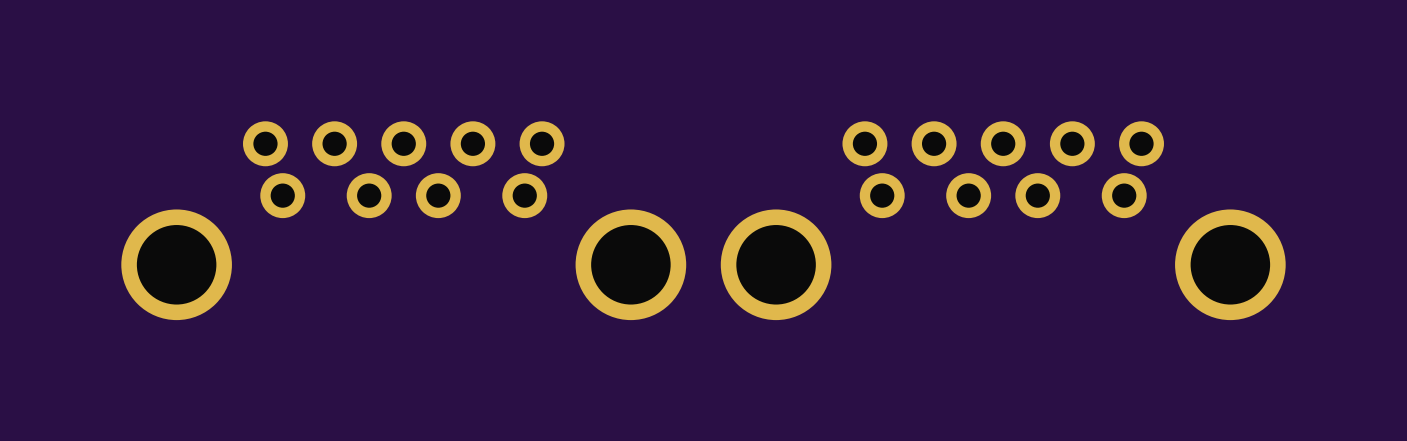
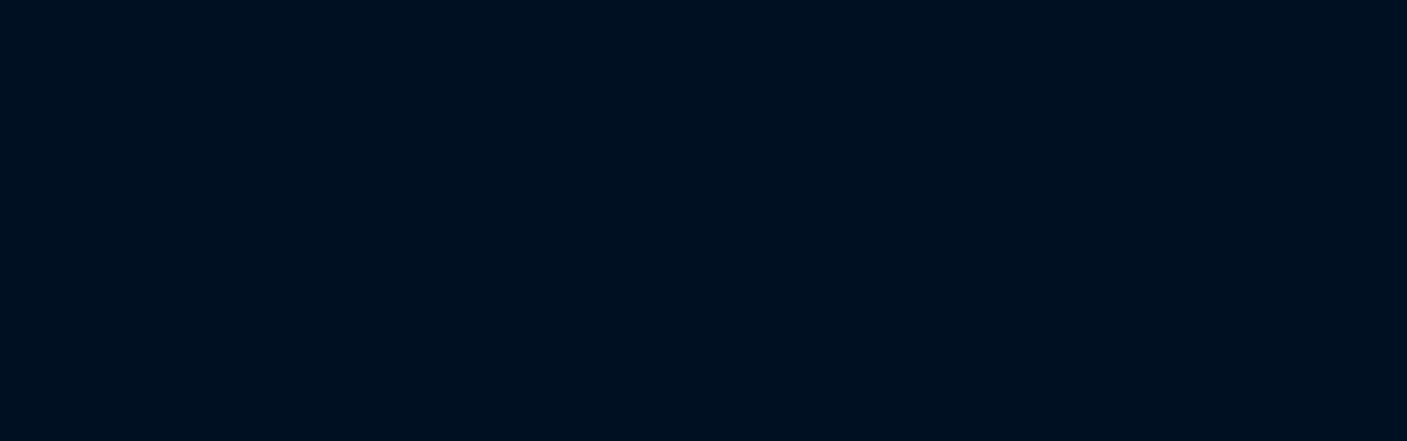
part: (403, 220) -> none
part: (1003, 220) -> none

